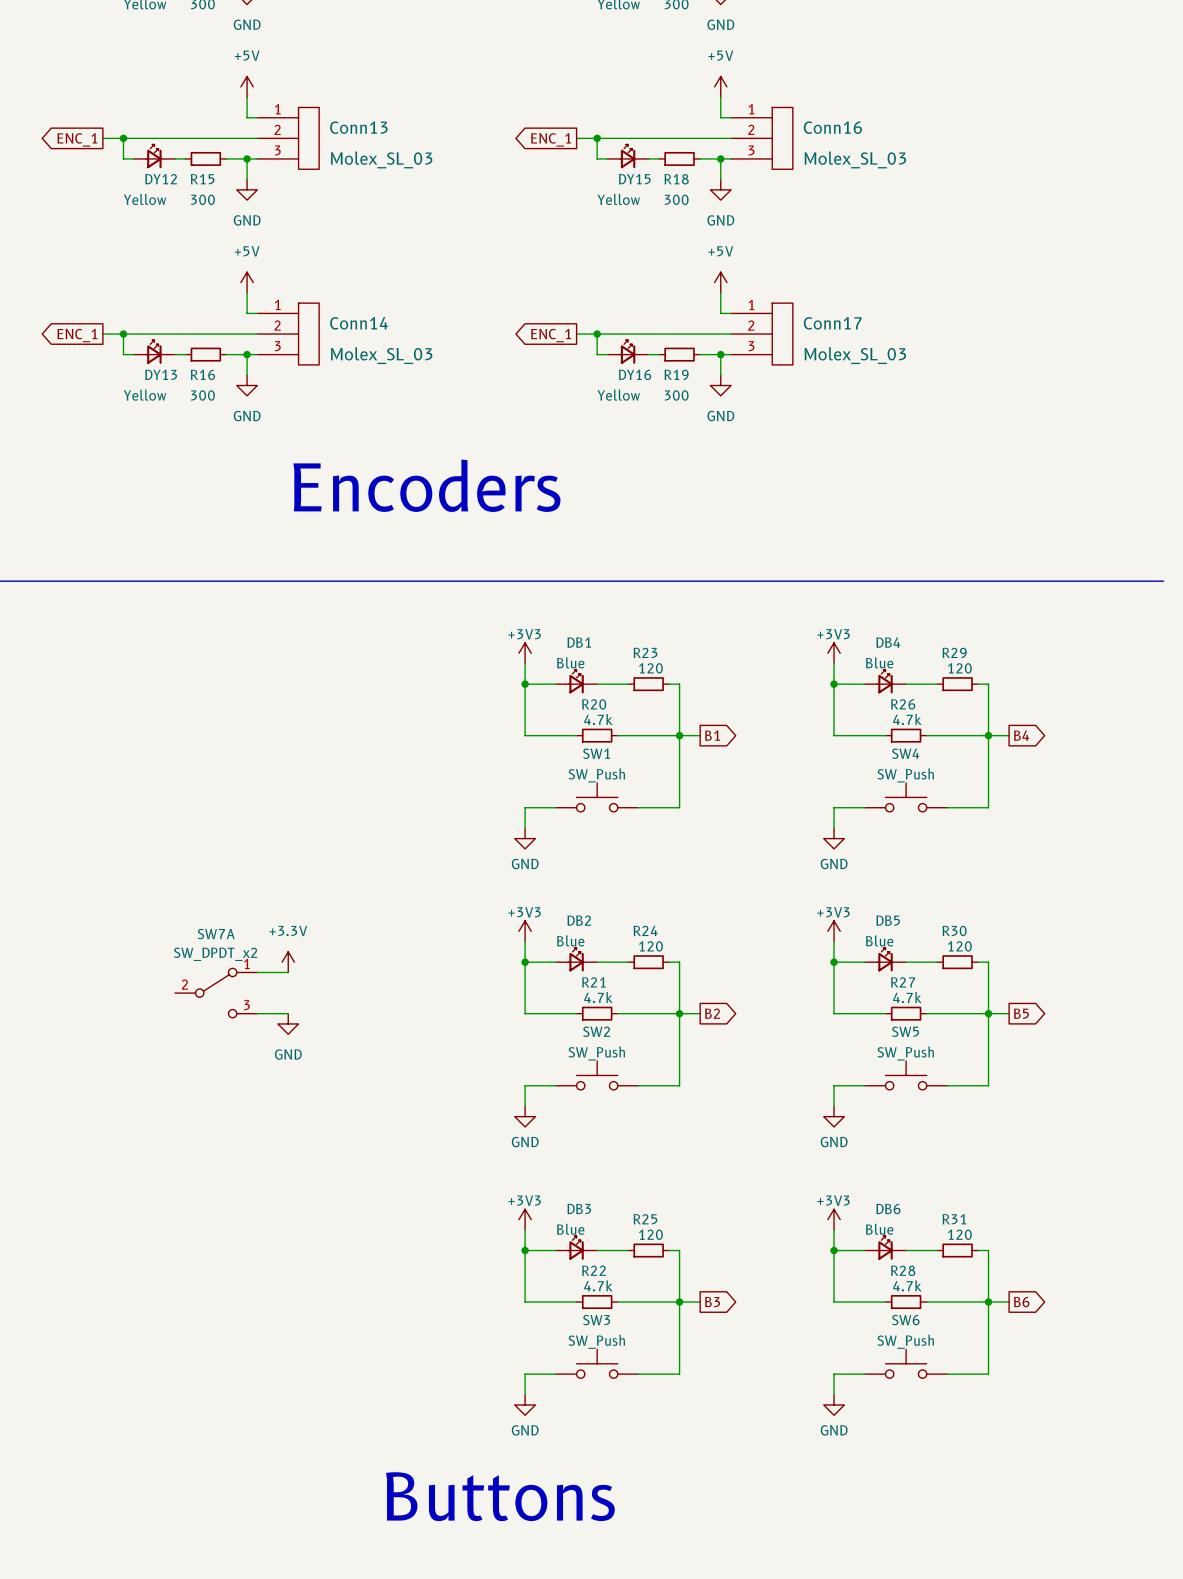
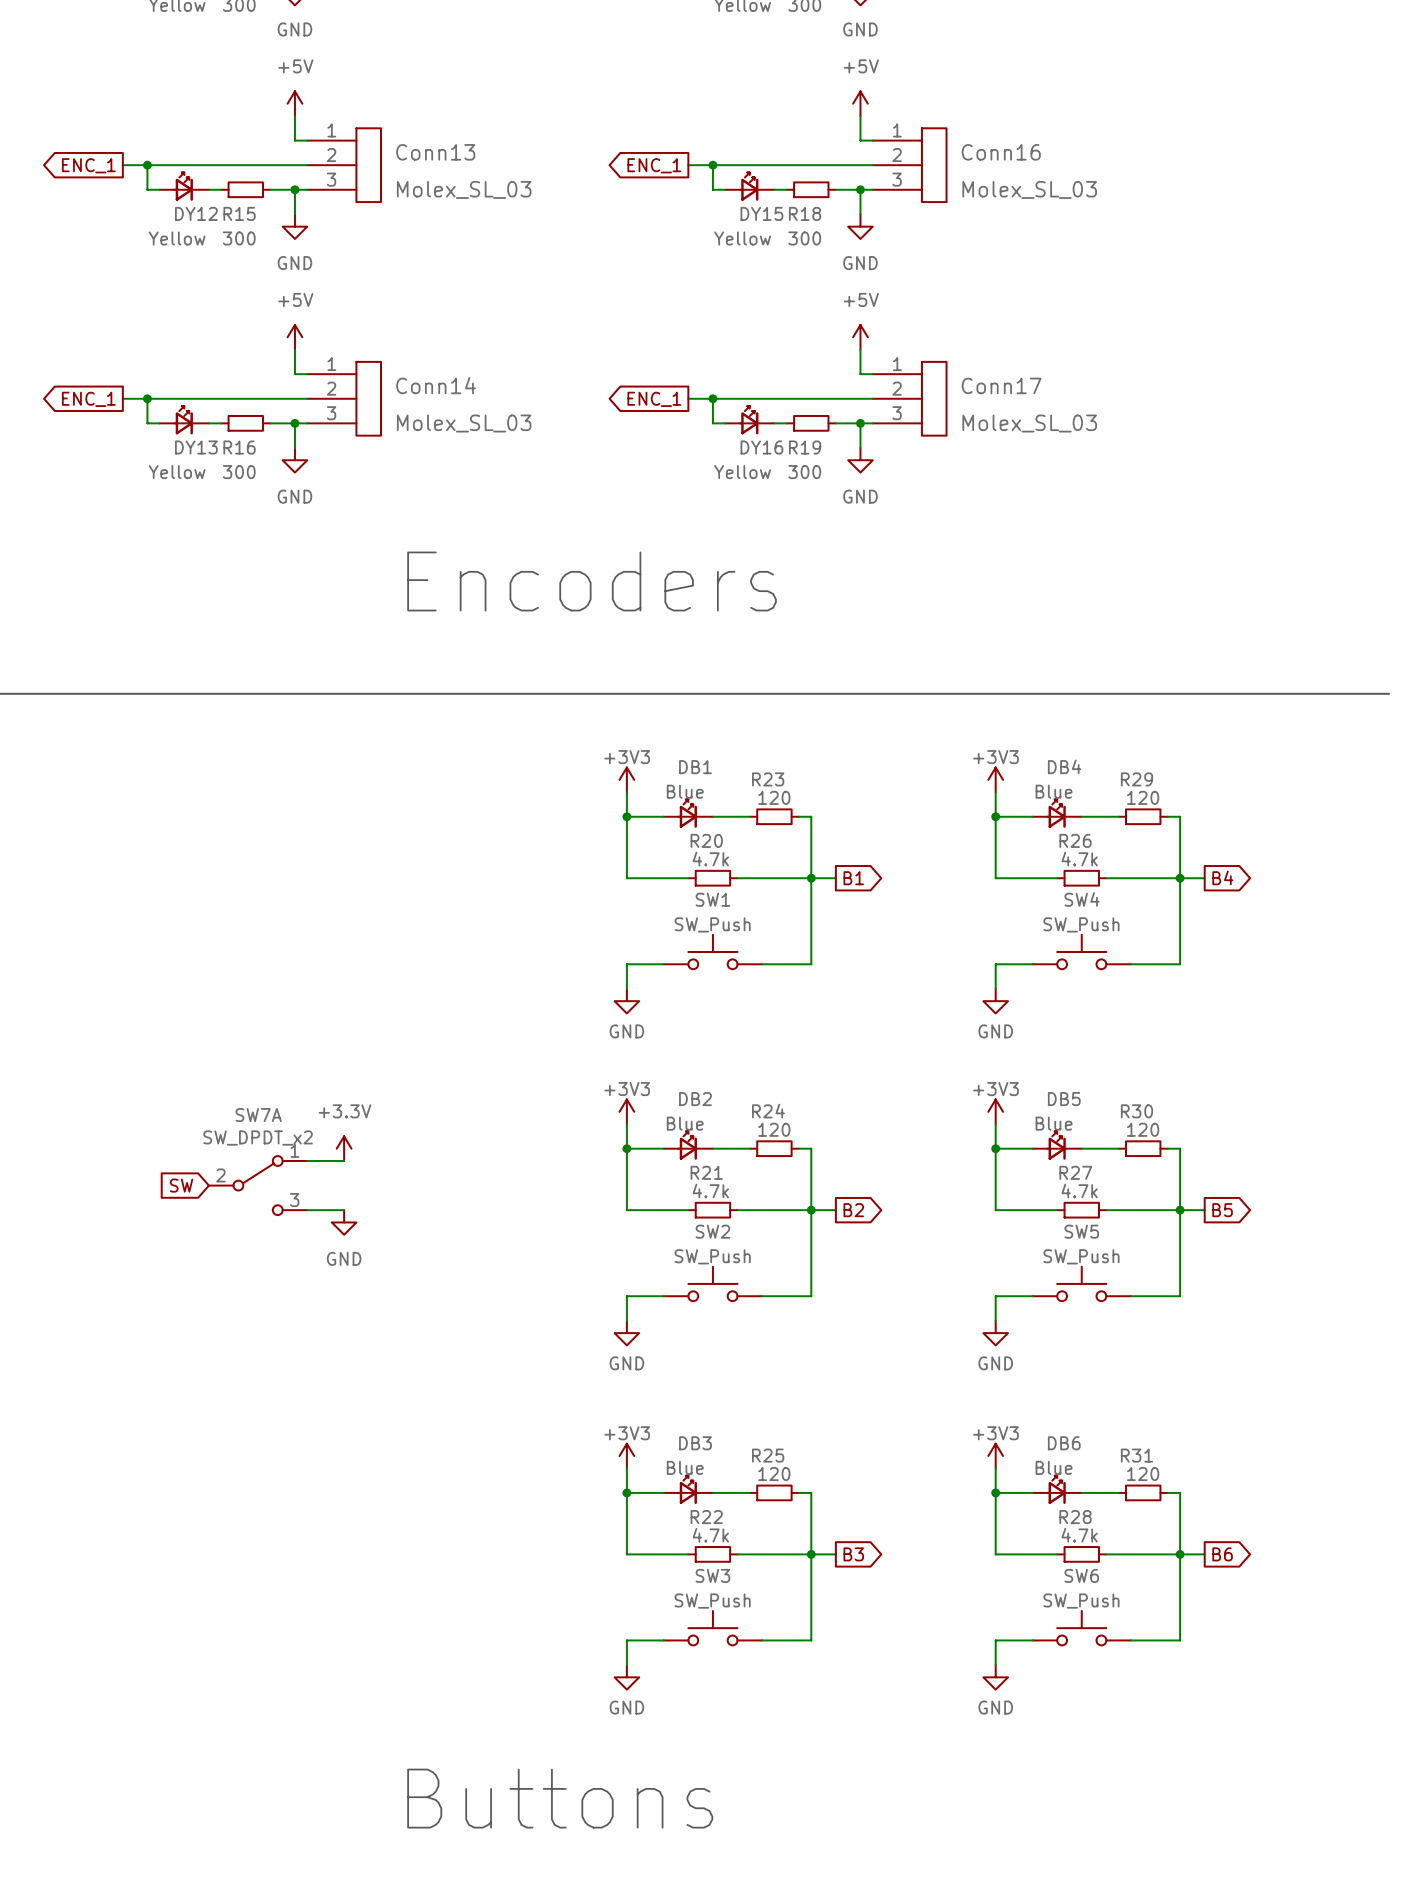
text position: Encoders (426, 485) -> Encoders (592, 581)
global label: none -> SW (181, 1185)
text position: Buttons (500, 1496) -> Buttons (560, 1798)

